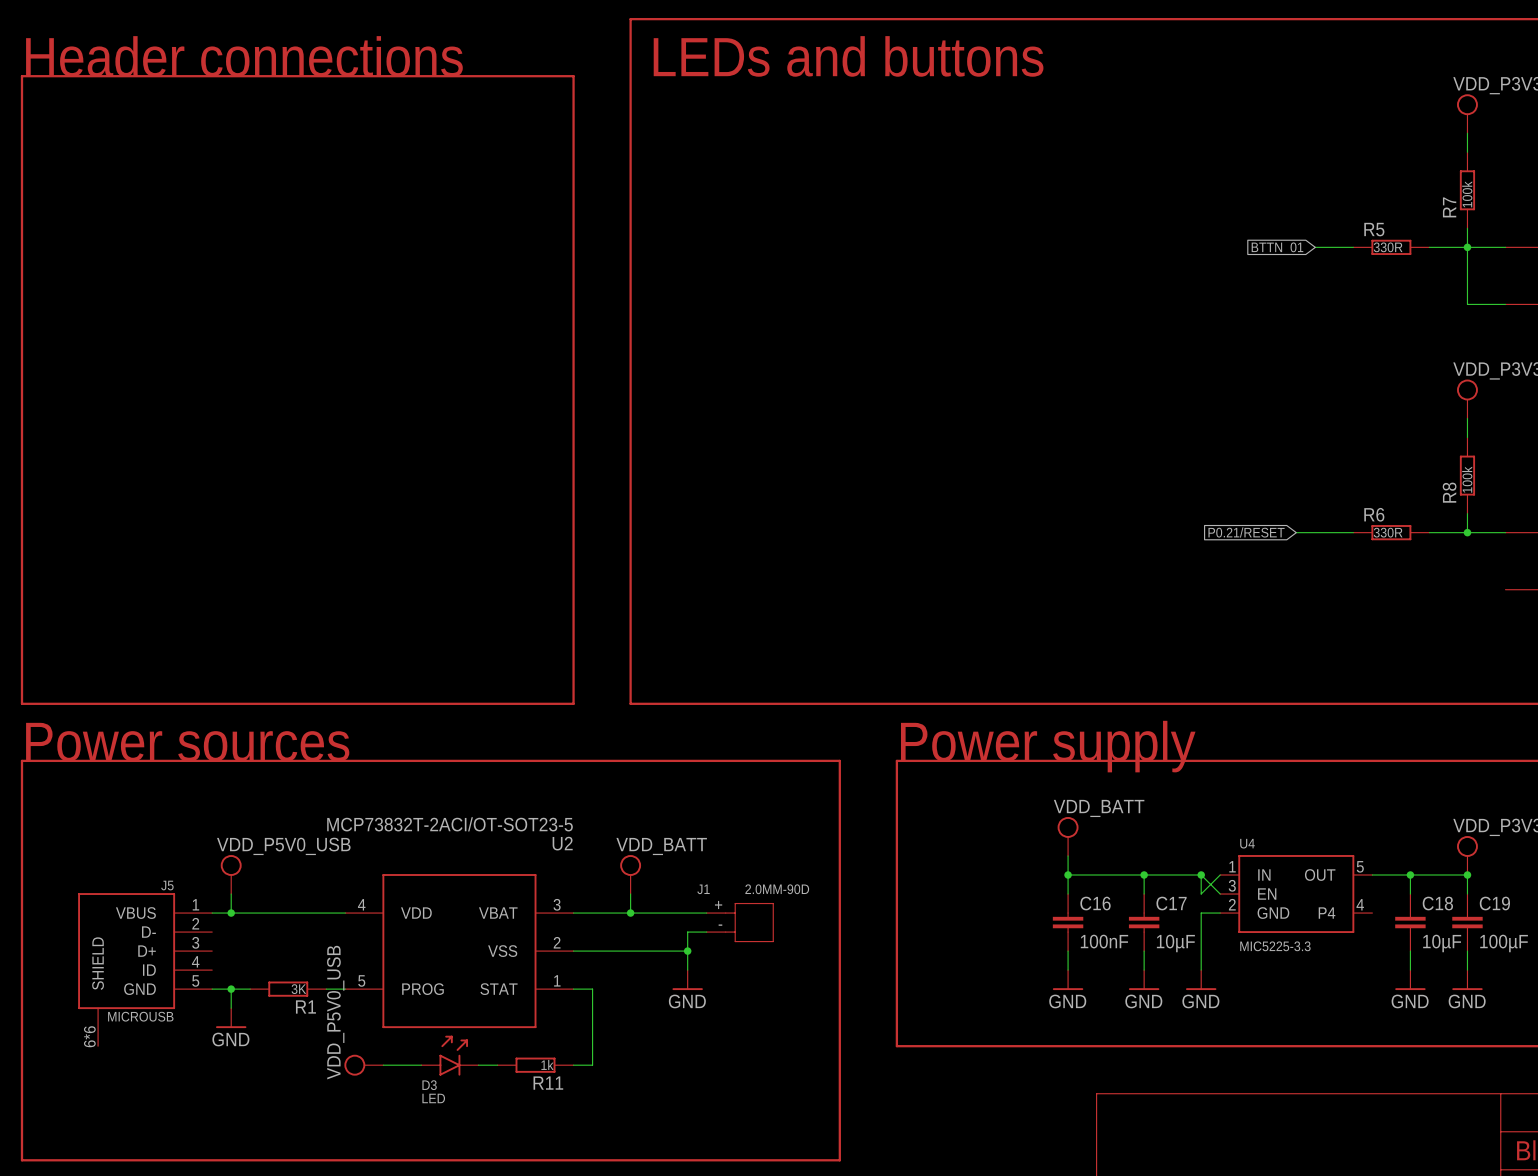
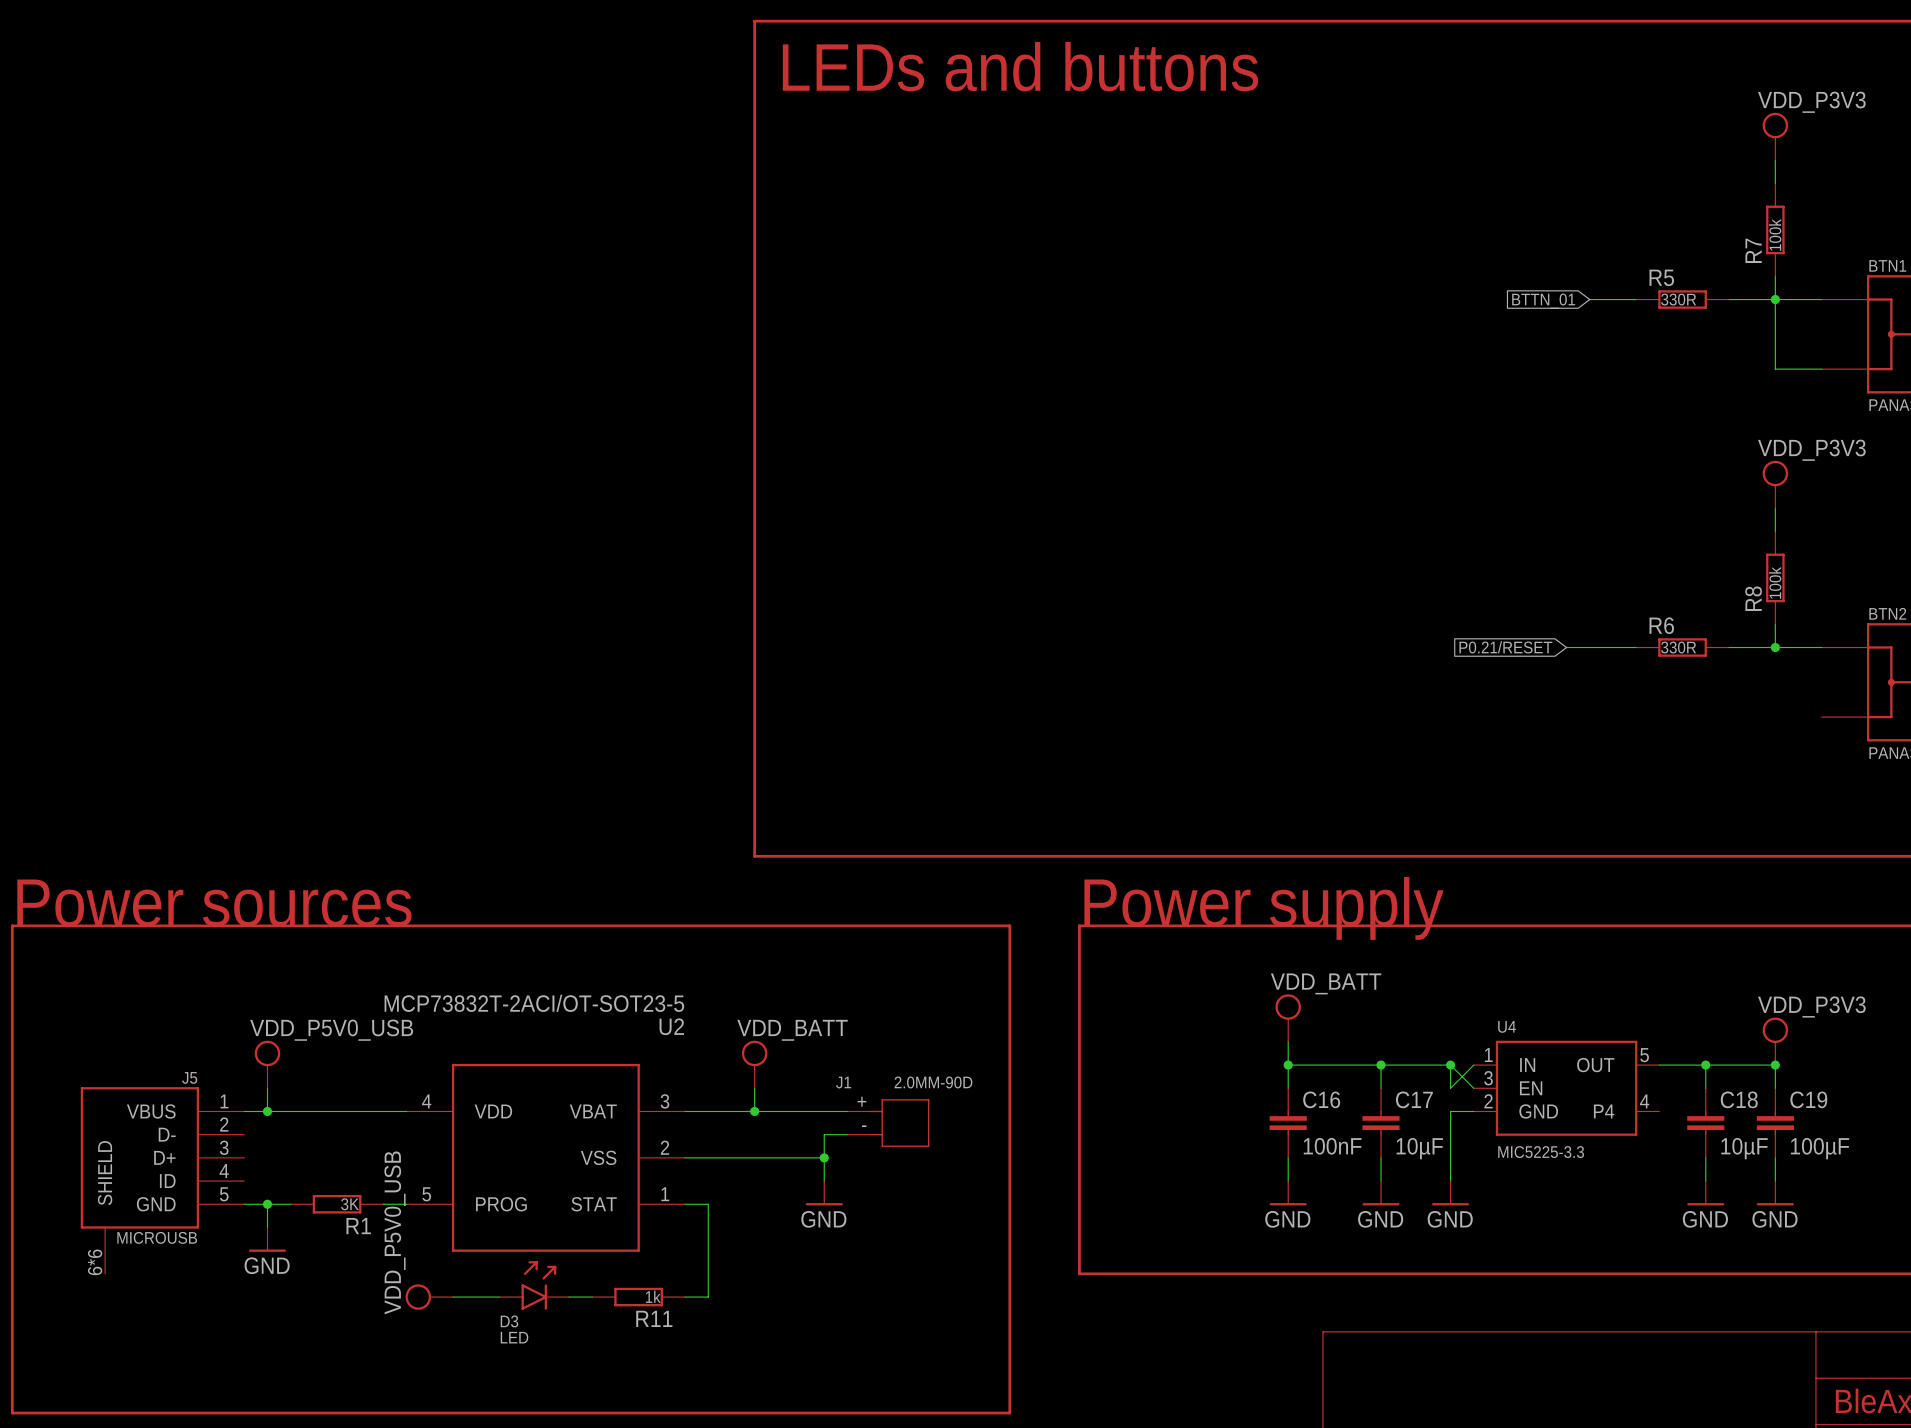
text: Header connections (244, 56) -> none
line: (21, 76) (21, 703) (573, 703) (573, 76) (21, 76) -> none

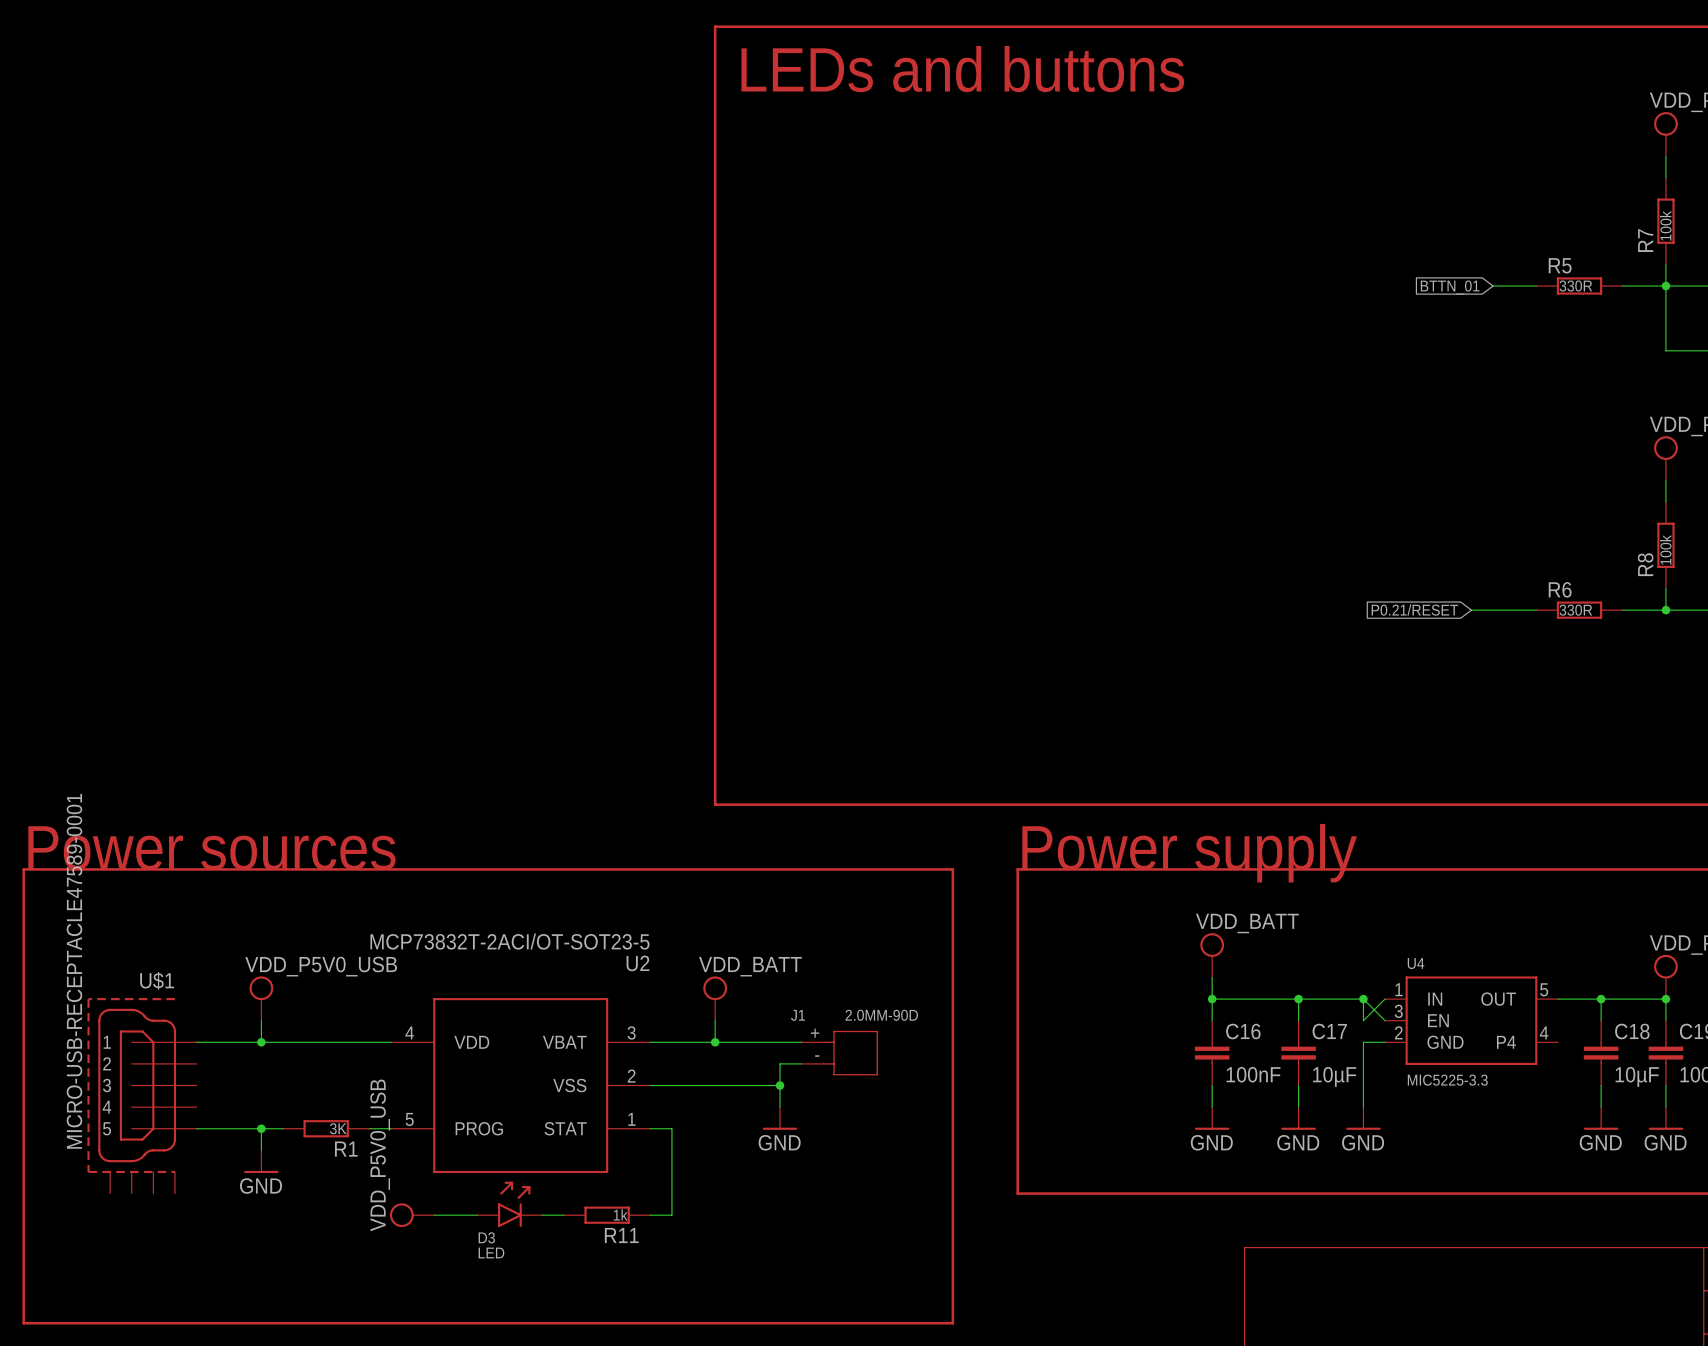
U$1: none -> MICRO-USB-RECEPTACLE47589-0001 (142, 1095)
J5: MICROUSB (162, 1180) -> none

